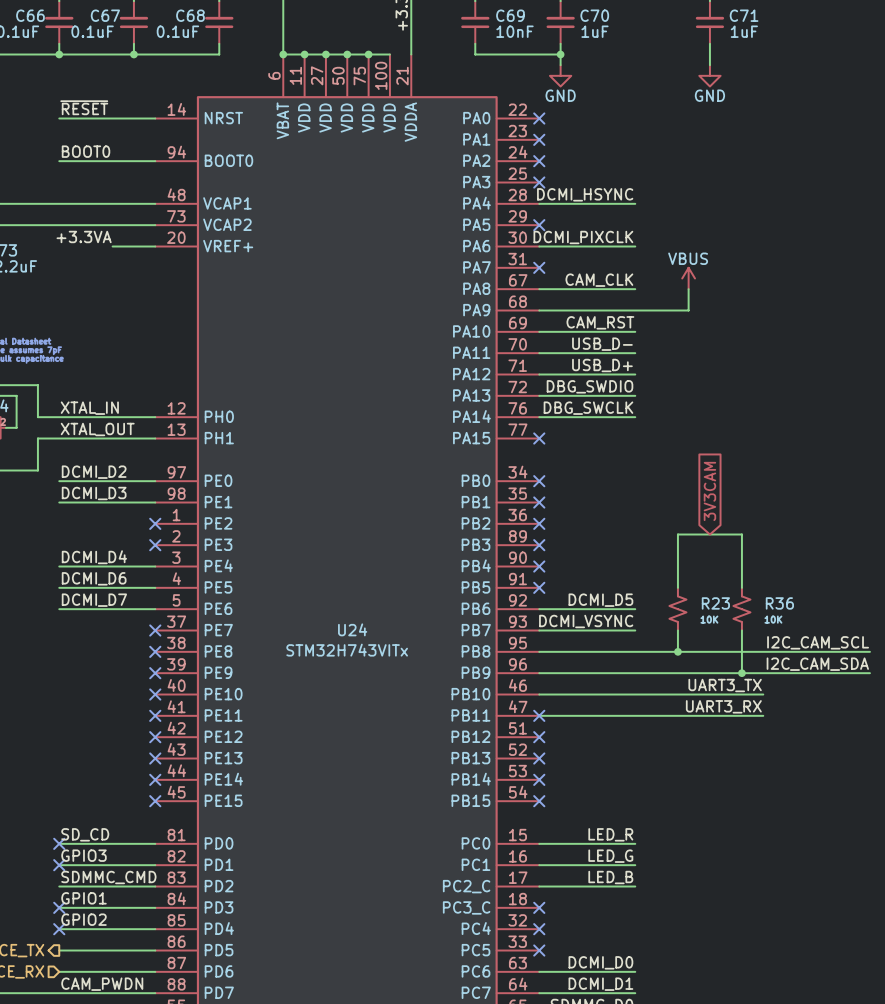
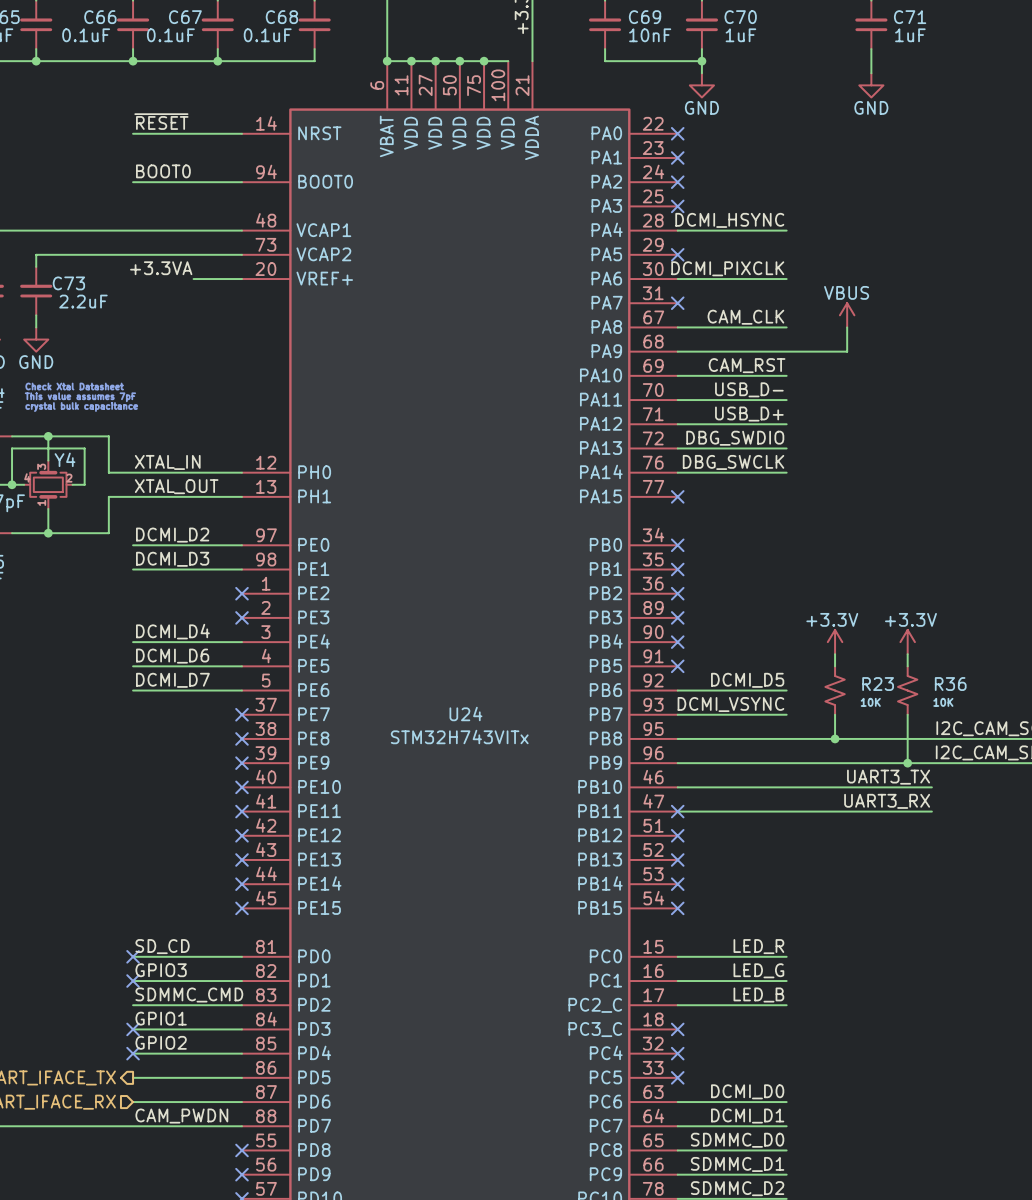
global label: 3V3CAM (709, 491) -> none
power symbol: none -> +3.3V (835, 642)
power symbol: none -> +3.3V (907, 642)
wire: (677, 577) (677, 534) (741, 534) (741, 577) -> none

